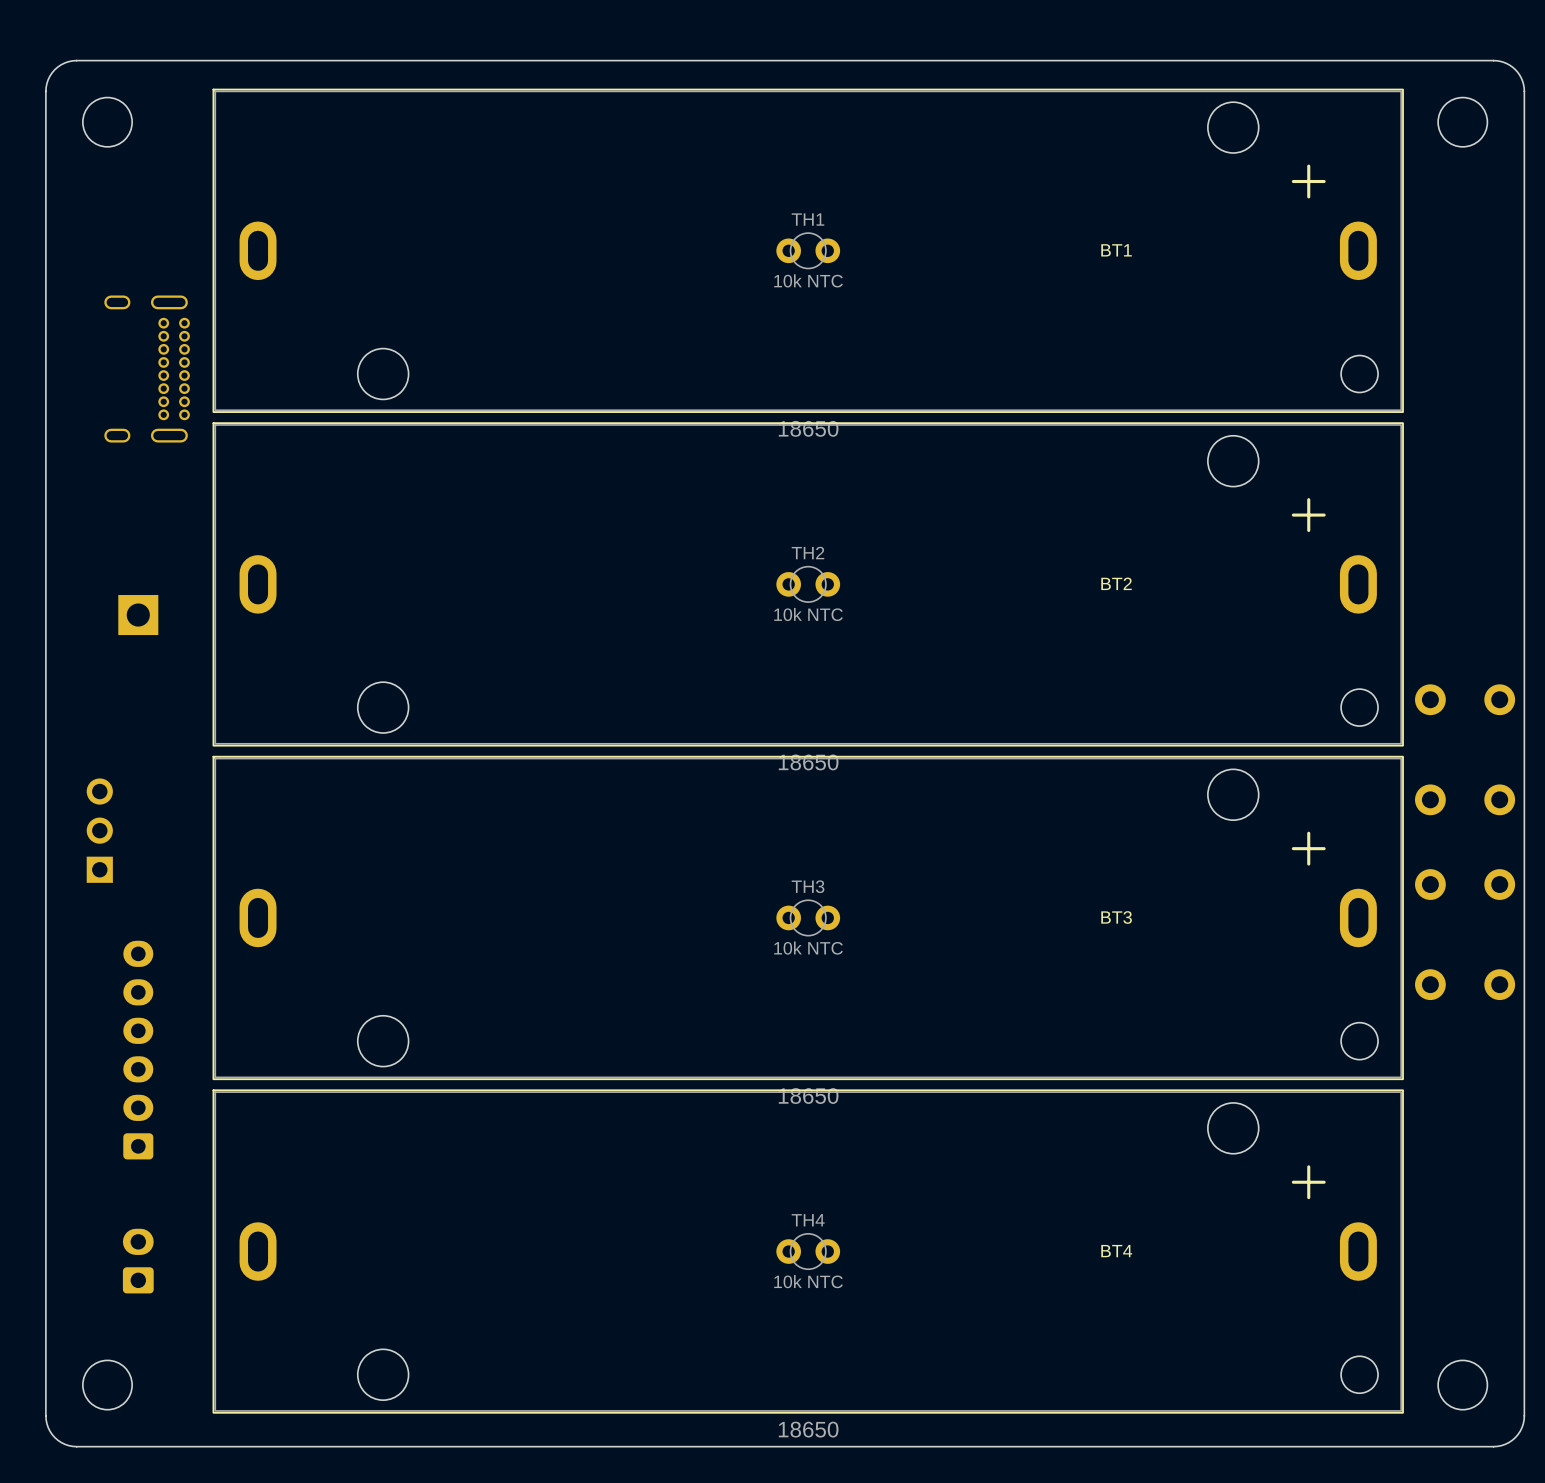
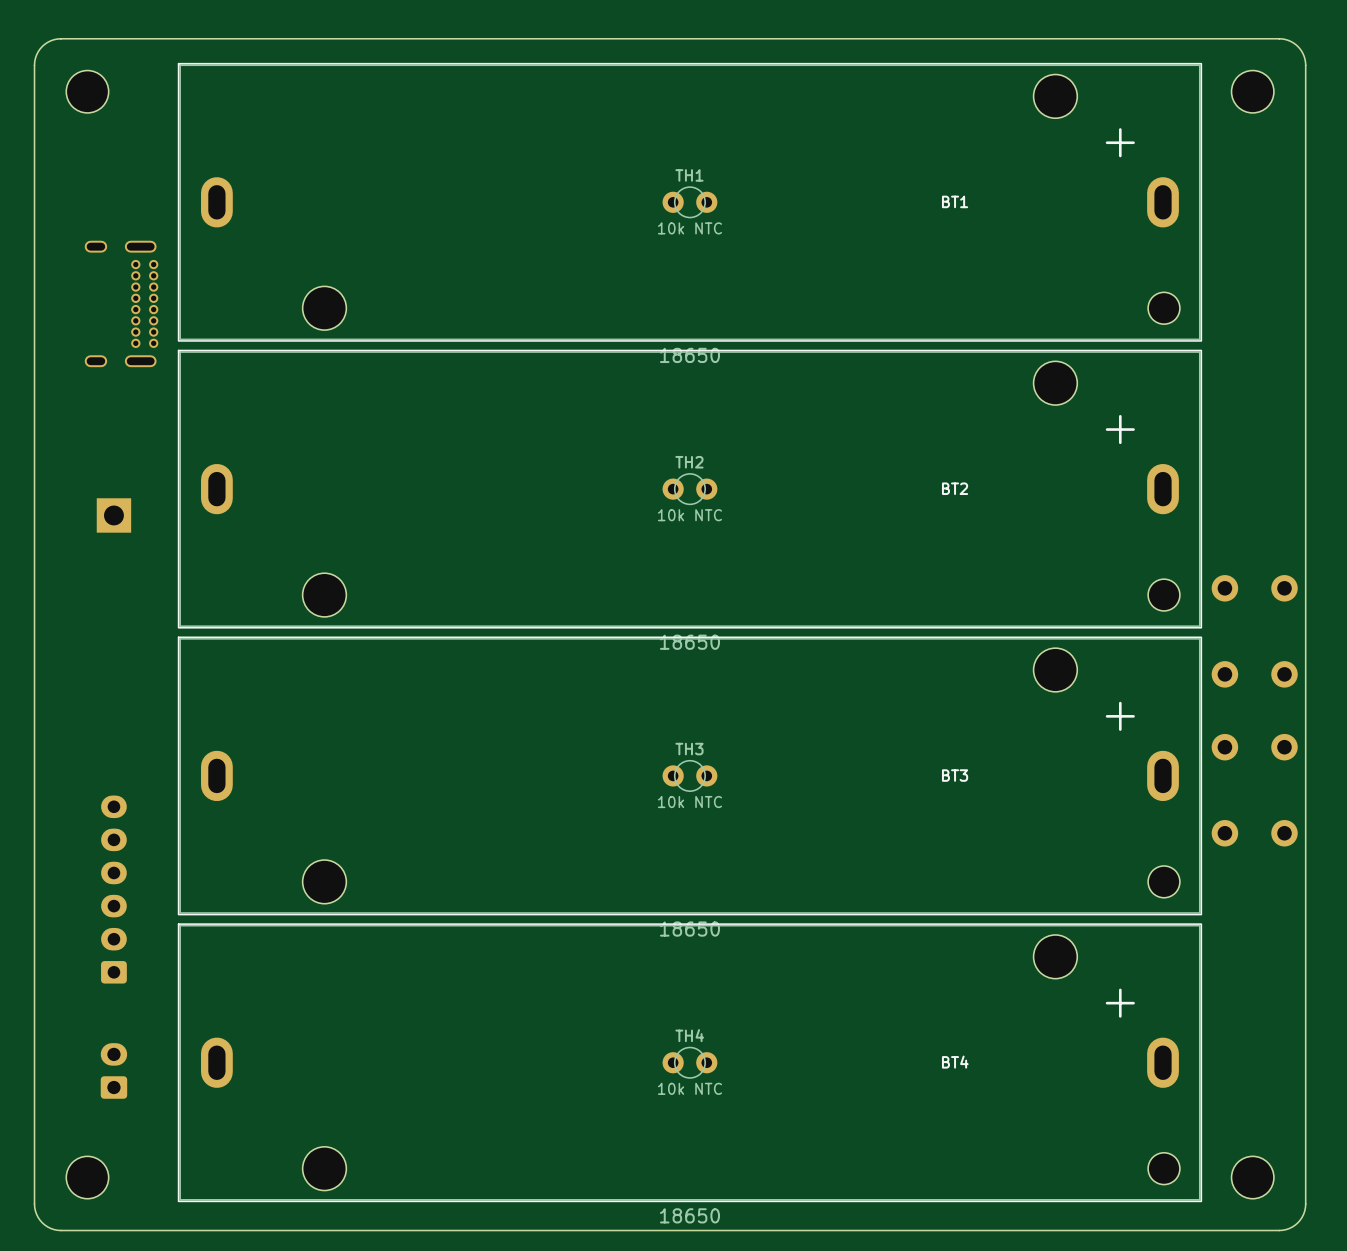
part: (99, 830) -> none

